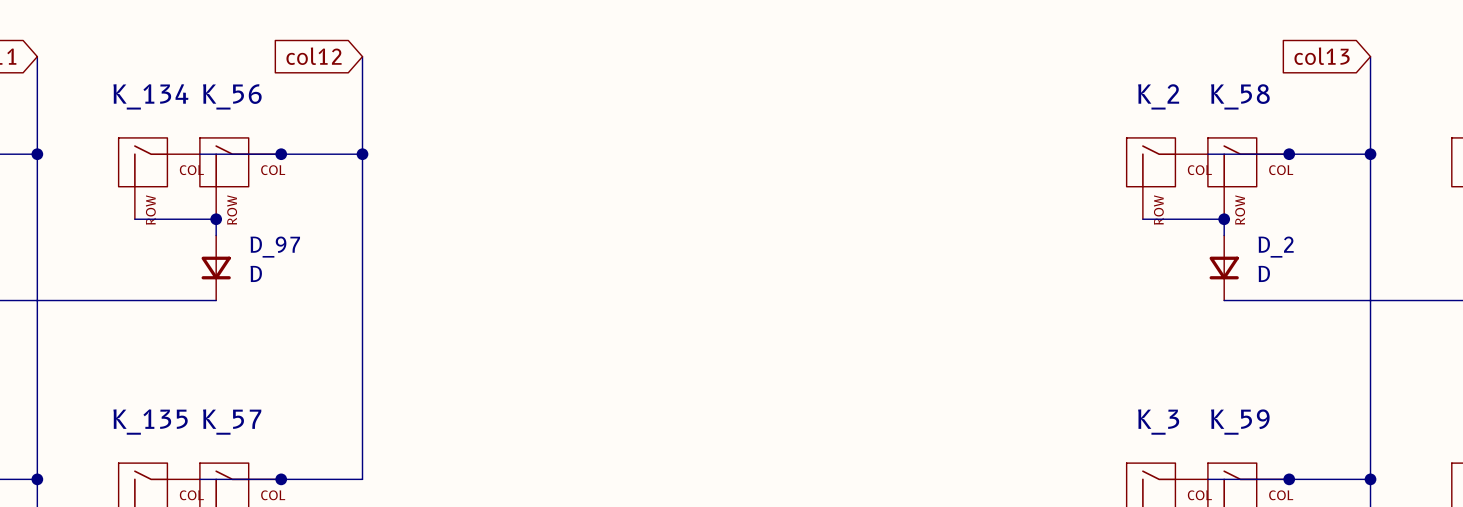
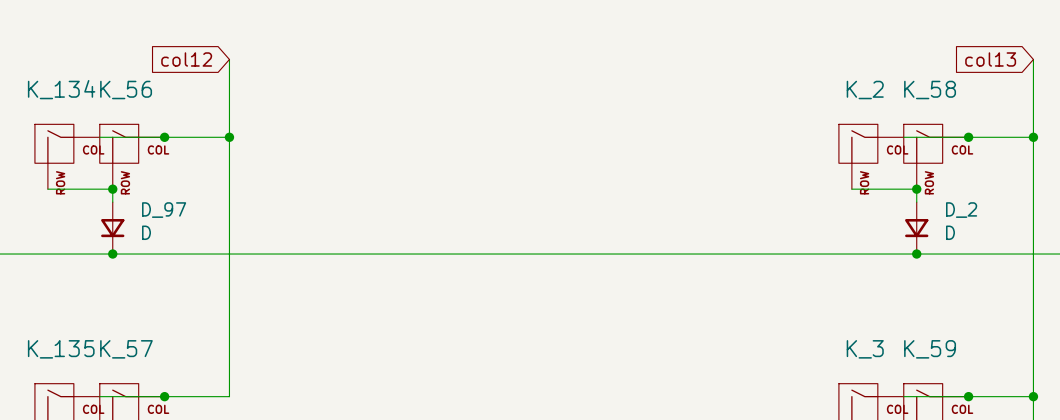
wire: none -> (112, 254) (916, 254)
junction: none -> (112, 254)
junction: none -> (916, 254)

